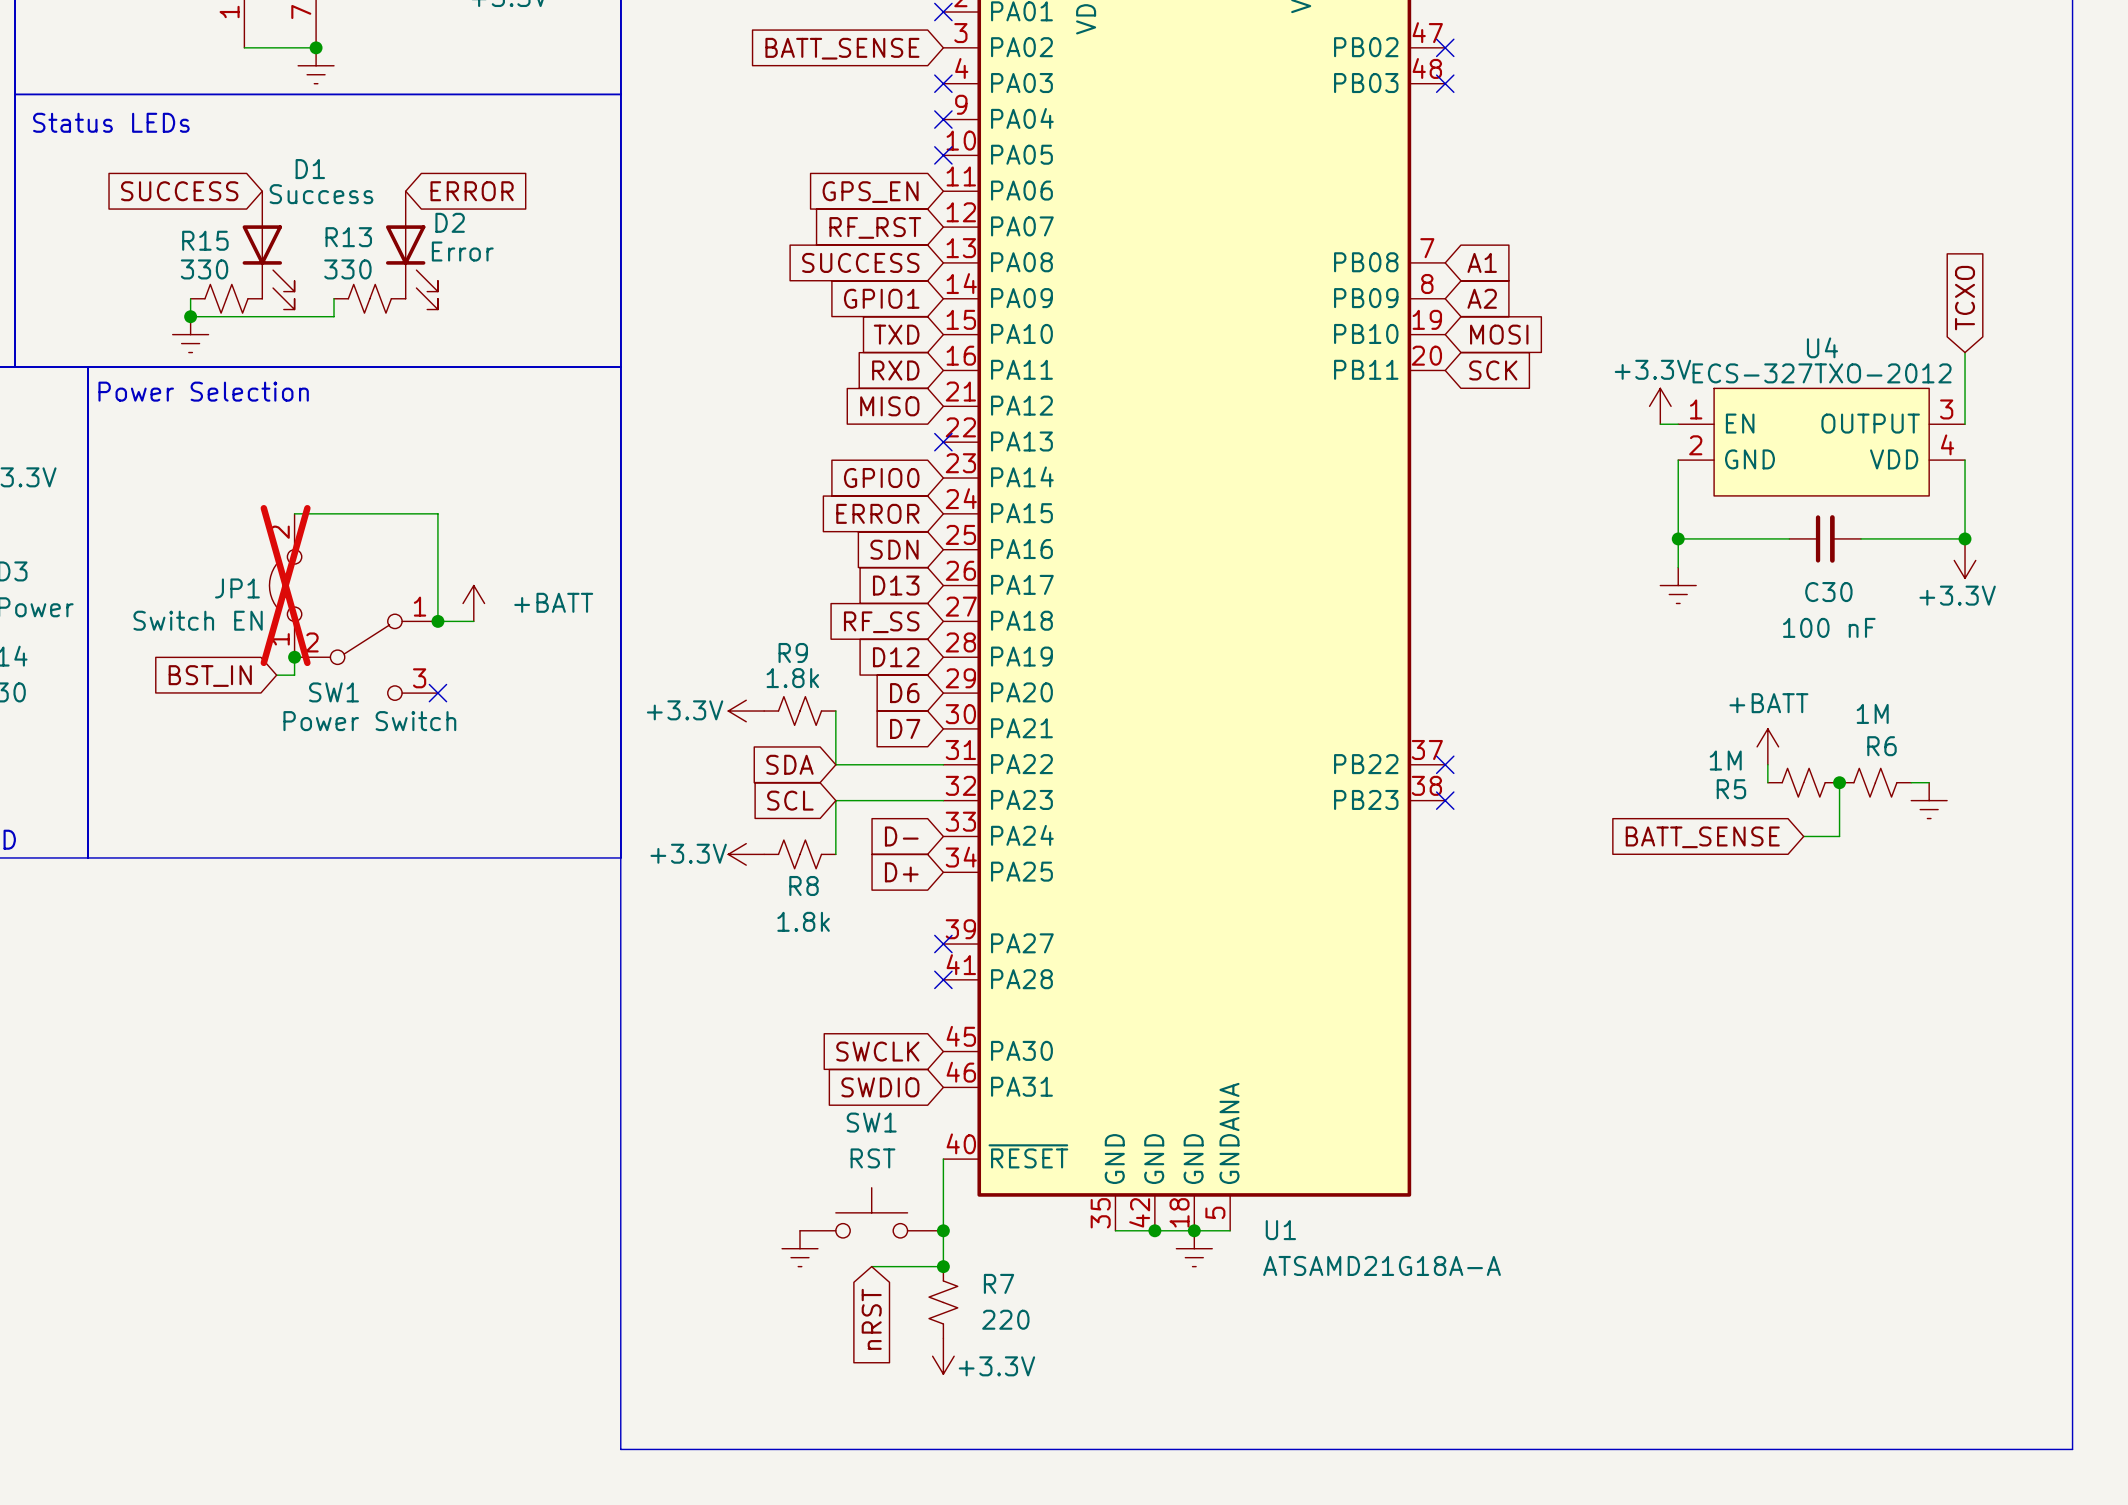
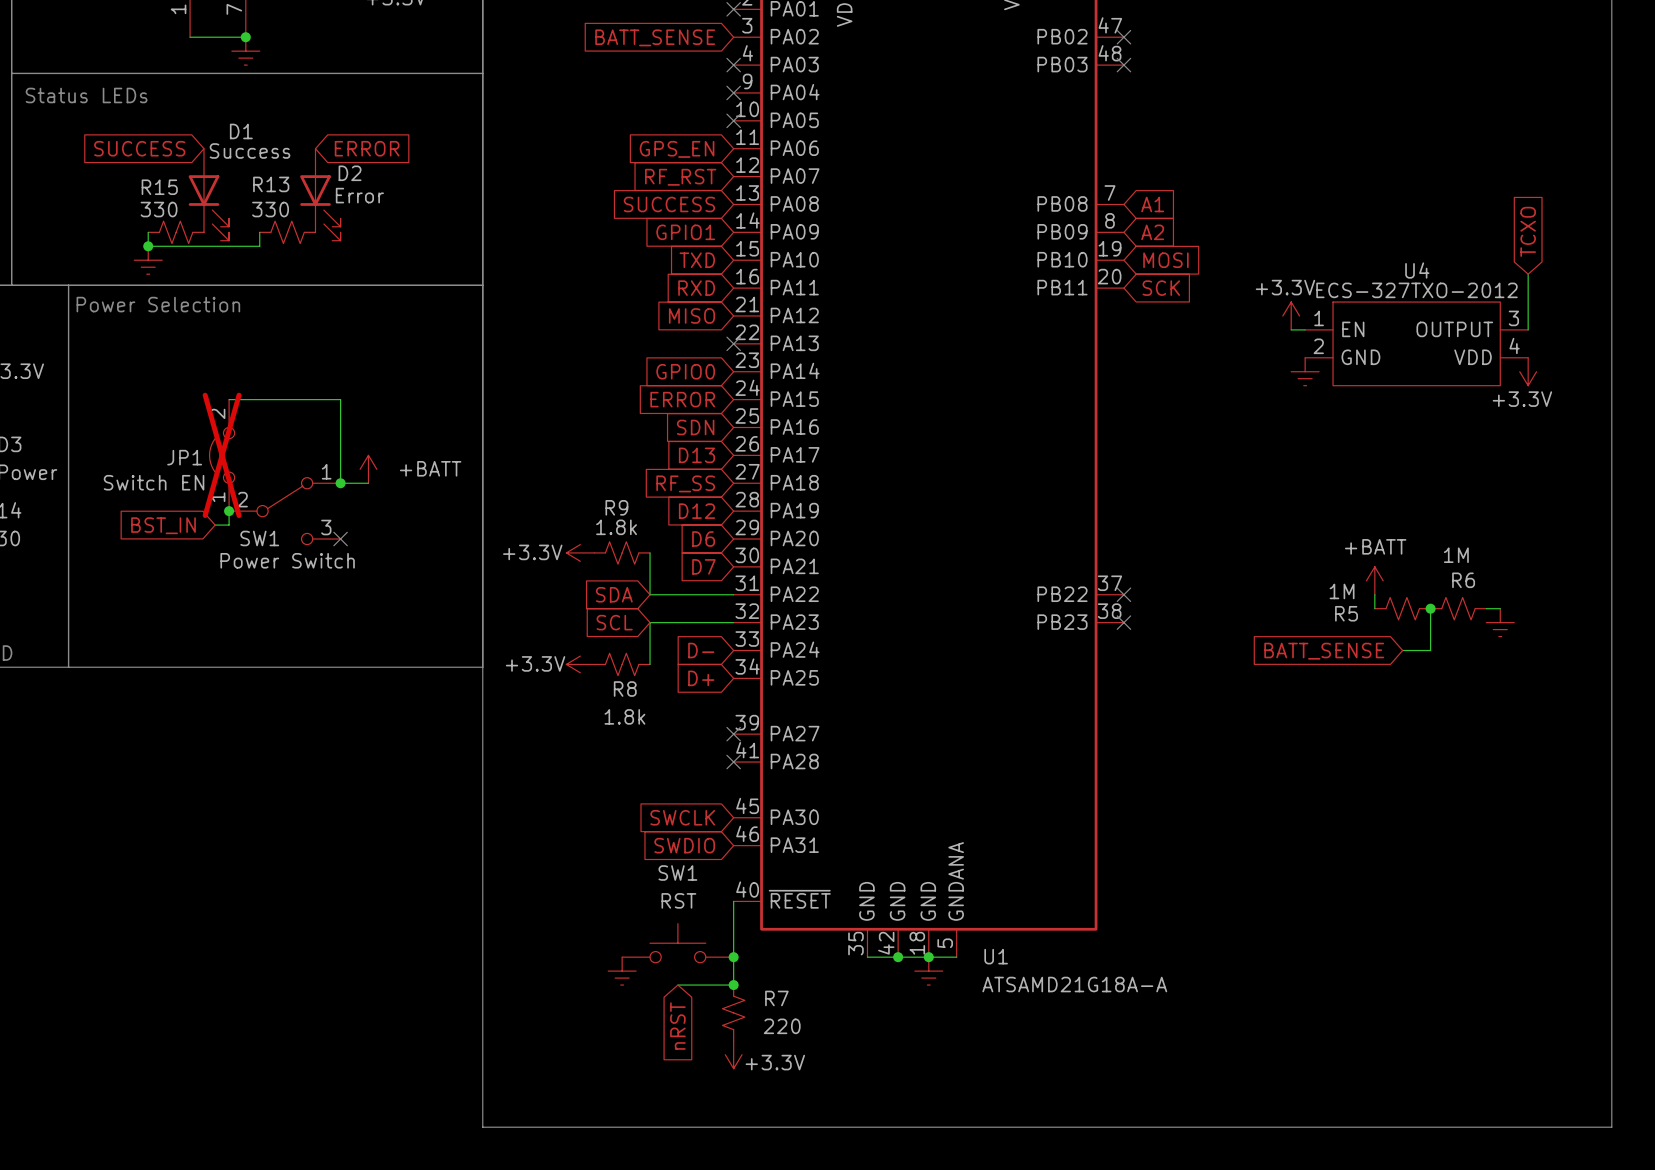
wire: (1678, 460) (1678, 567) -> none
wire: (1965, 460) (1965, 542) -> none
wire: (1678, 538) (1789, 538) -> none
junction: (1678, 538) -> none
C30: 100 nF (1825, 538) -> none
wire: (1861, 538) (1965, 538) -> none
junction: (1965, 538) -> none
power symbol position: +3.3V (1965, 560) -> +3.3V (1528, 371)
power symbol position: (1678, 585) -> (1305, 371)

